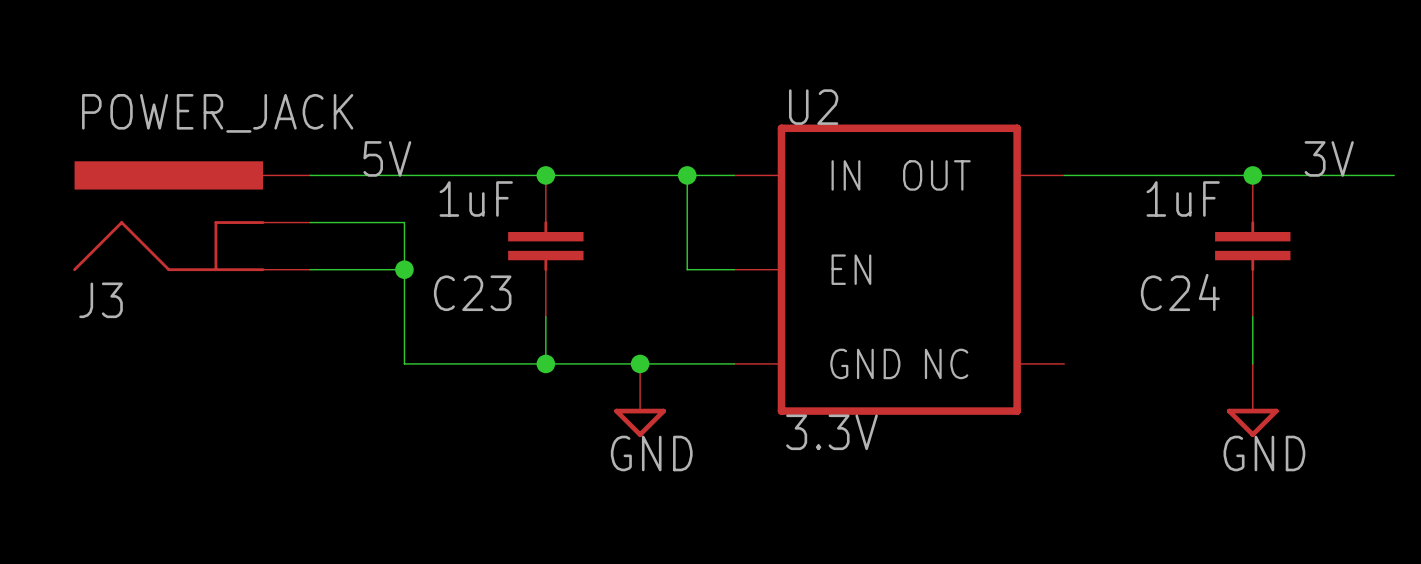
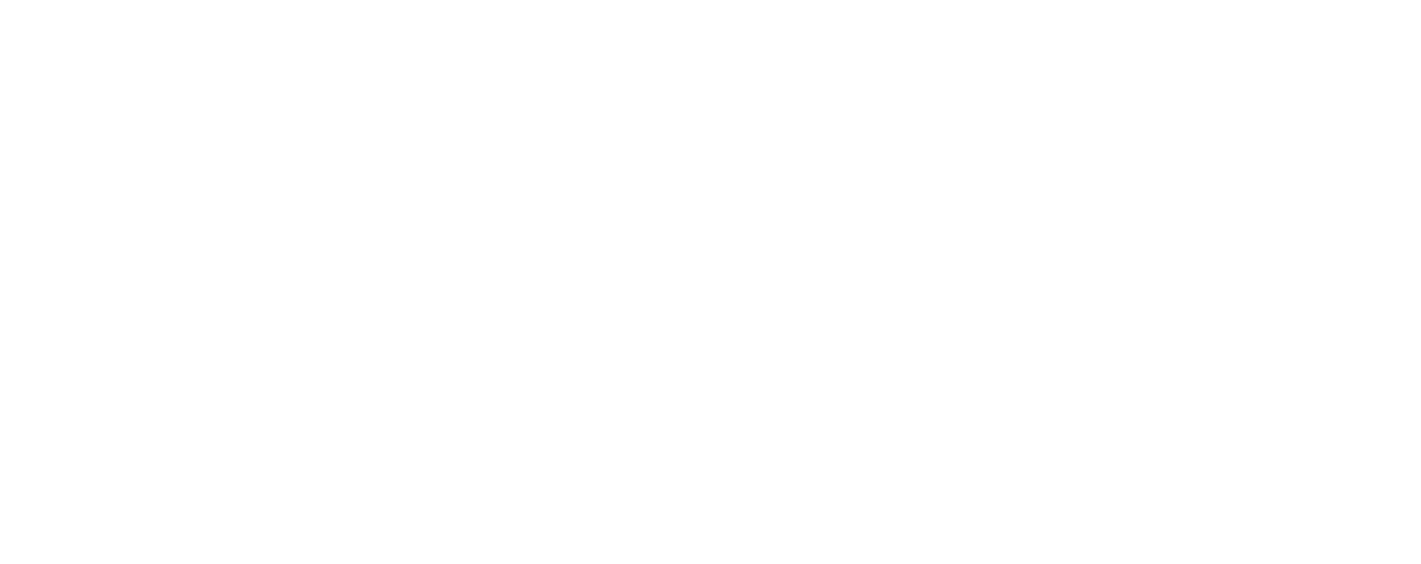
label: 5V (387, 158) -> none
label: 3V (1329, 158) -> none
wire: (310, 175) (734, 175) -> none
junction: (545, 175) -> none
wire: (687, 175) (687, 269) (734, 269) -> none
junction: (687, 175) -> none
wire: (1064, 175) (1394, 175) -> none
junction: (1252, 175) -> none
J3: POWER_JACK (191, 216) -> none
wire: (310, 222) (404, 222) (404, 363) (734, 363) -> none
C23: 1uF (545, 246) -> none
C24: 1uF (1252, 246) -> none
wire: (310, 269) (404, 269) -> none
junction: (404, 269) -> none
U2: 3.3V (899, 269) -> none
wire: (545, 316) (545, 363) -> none
wire: (1252, 316) (1252, 363) -> none
junction: (545, 363) -> none
junction: (640, 363) -> none
power symbol: GND (640, 400) -> none
power symbol: GND (1252, 400) -> none

